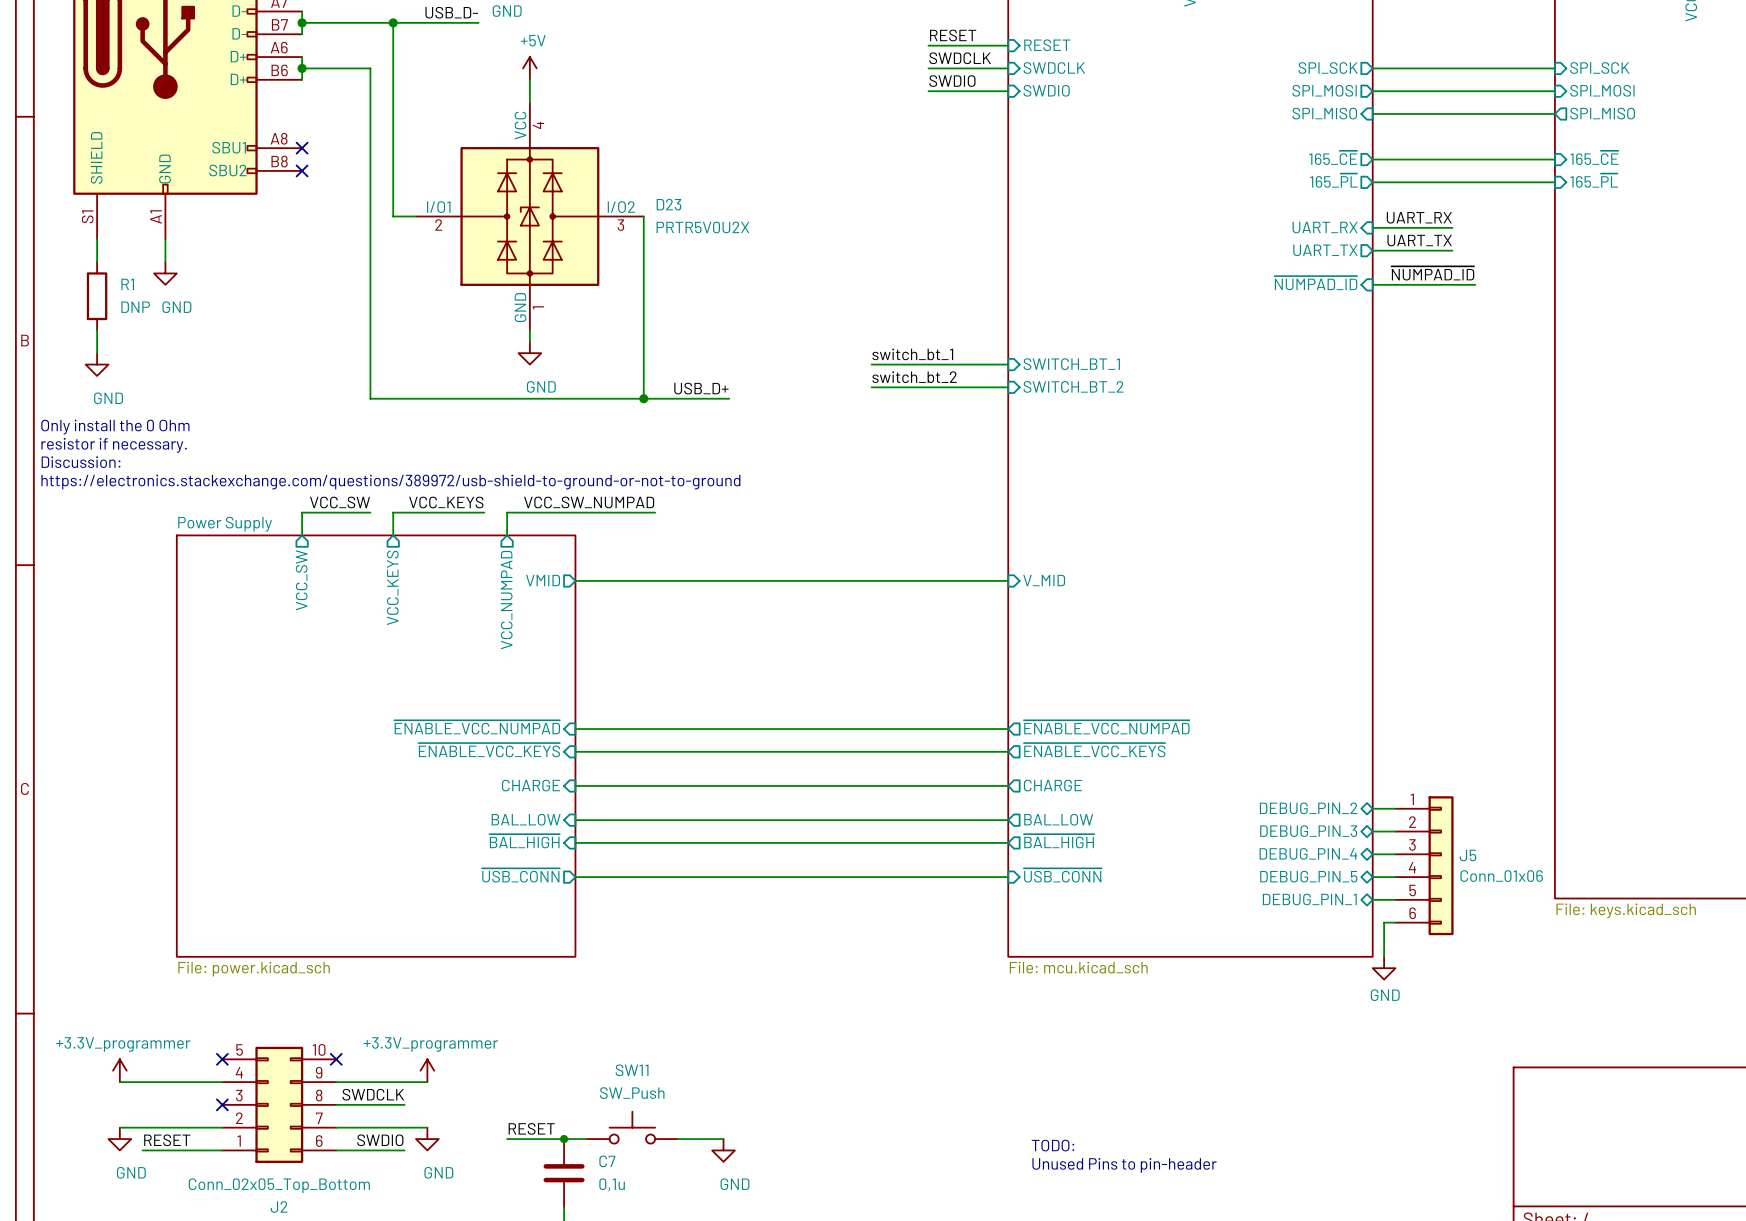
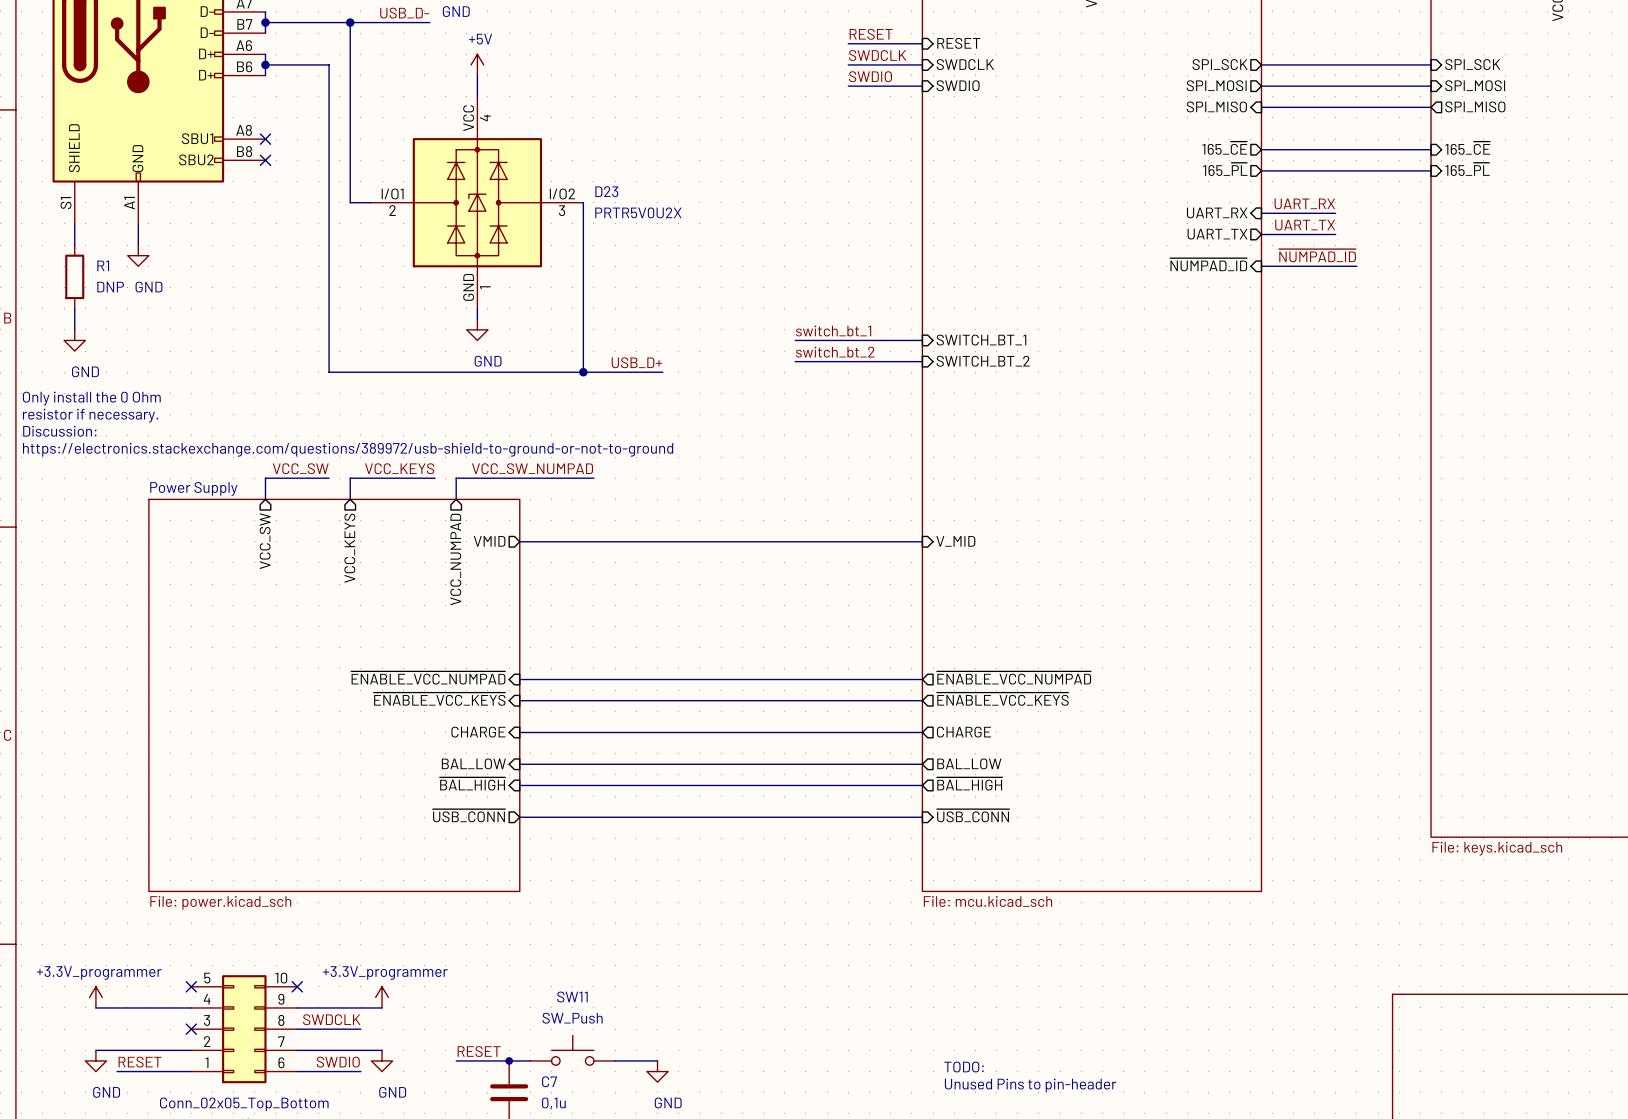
sheet pin: DEBUG_PIN_2 (1308, 808) -> none
wire: (1372, 808) (1395, 808) -> none
sheet pin: DEBUG_PIN_3 (1308, 831) -> none
wire: (1372, 831) (1395, 831) -> none
sheet pin: DEBUG_PIN_4 (1308, 853) -> none
wire: (1372, 854) (1395, 854) -> none
J5: Conn_01x06 (1424, 865) -> none
sheet pin: DEBUG_PIN_5 (1308, 876) -> none
wire: (1372, 877) (1395, 877) -> none
sheet pin: DEBUG_PIN_1 (1309, 899) -> none
wire: (1372, 899) (1395, 899) -> none
wire: (1395, 922) (1384, 922) (1384, 956) -> none
power symbol: GND (1384, 968) -> none

